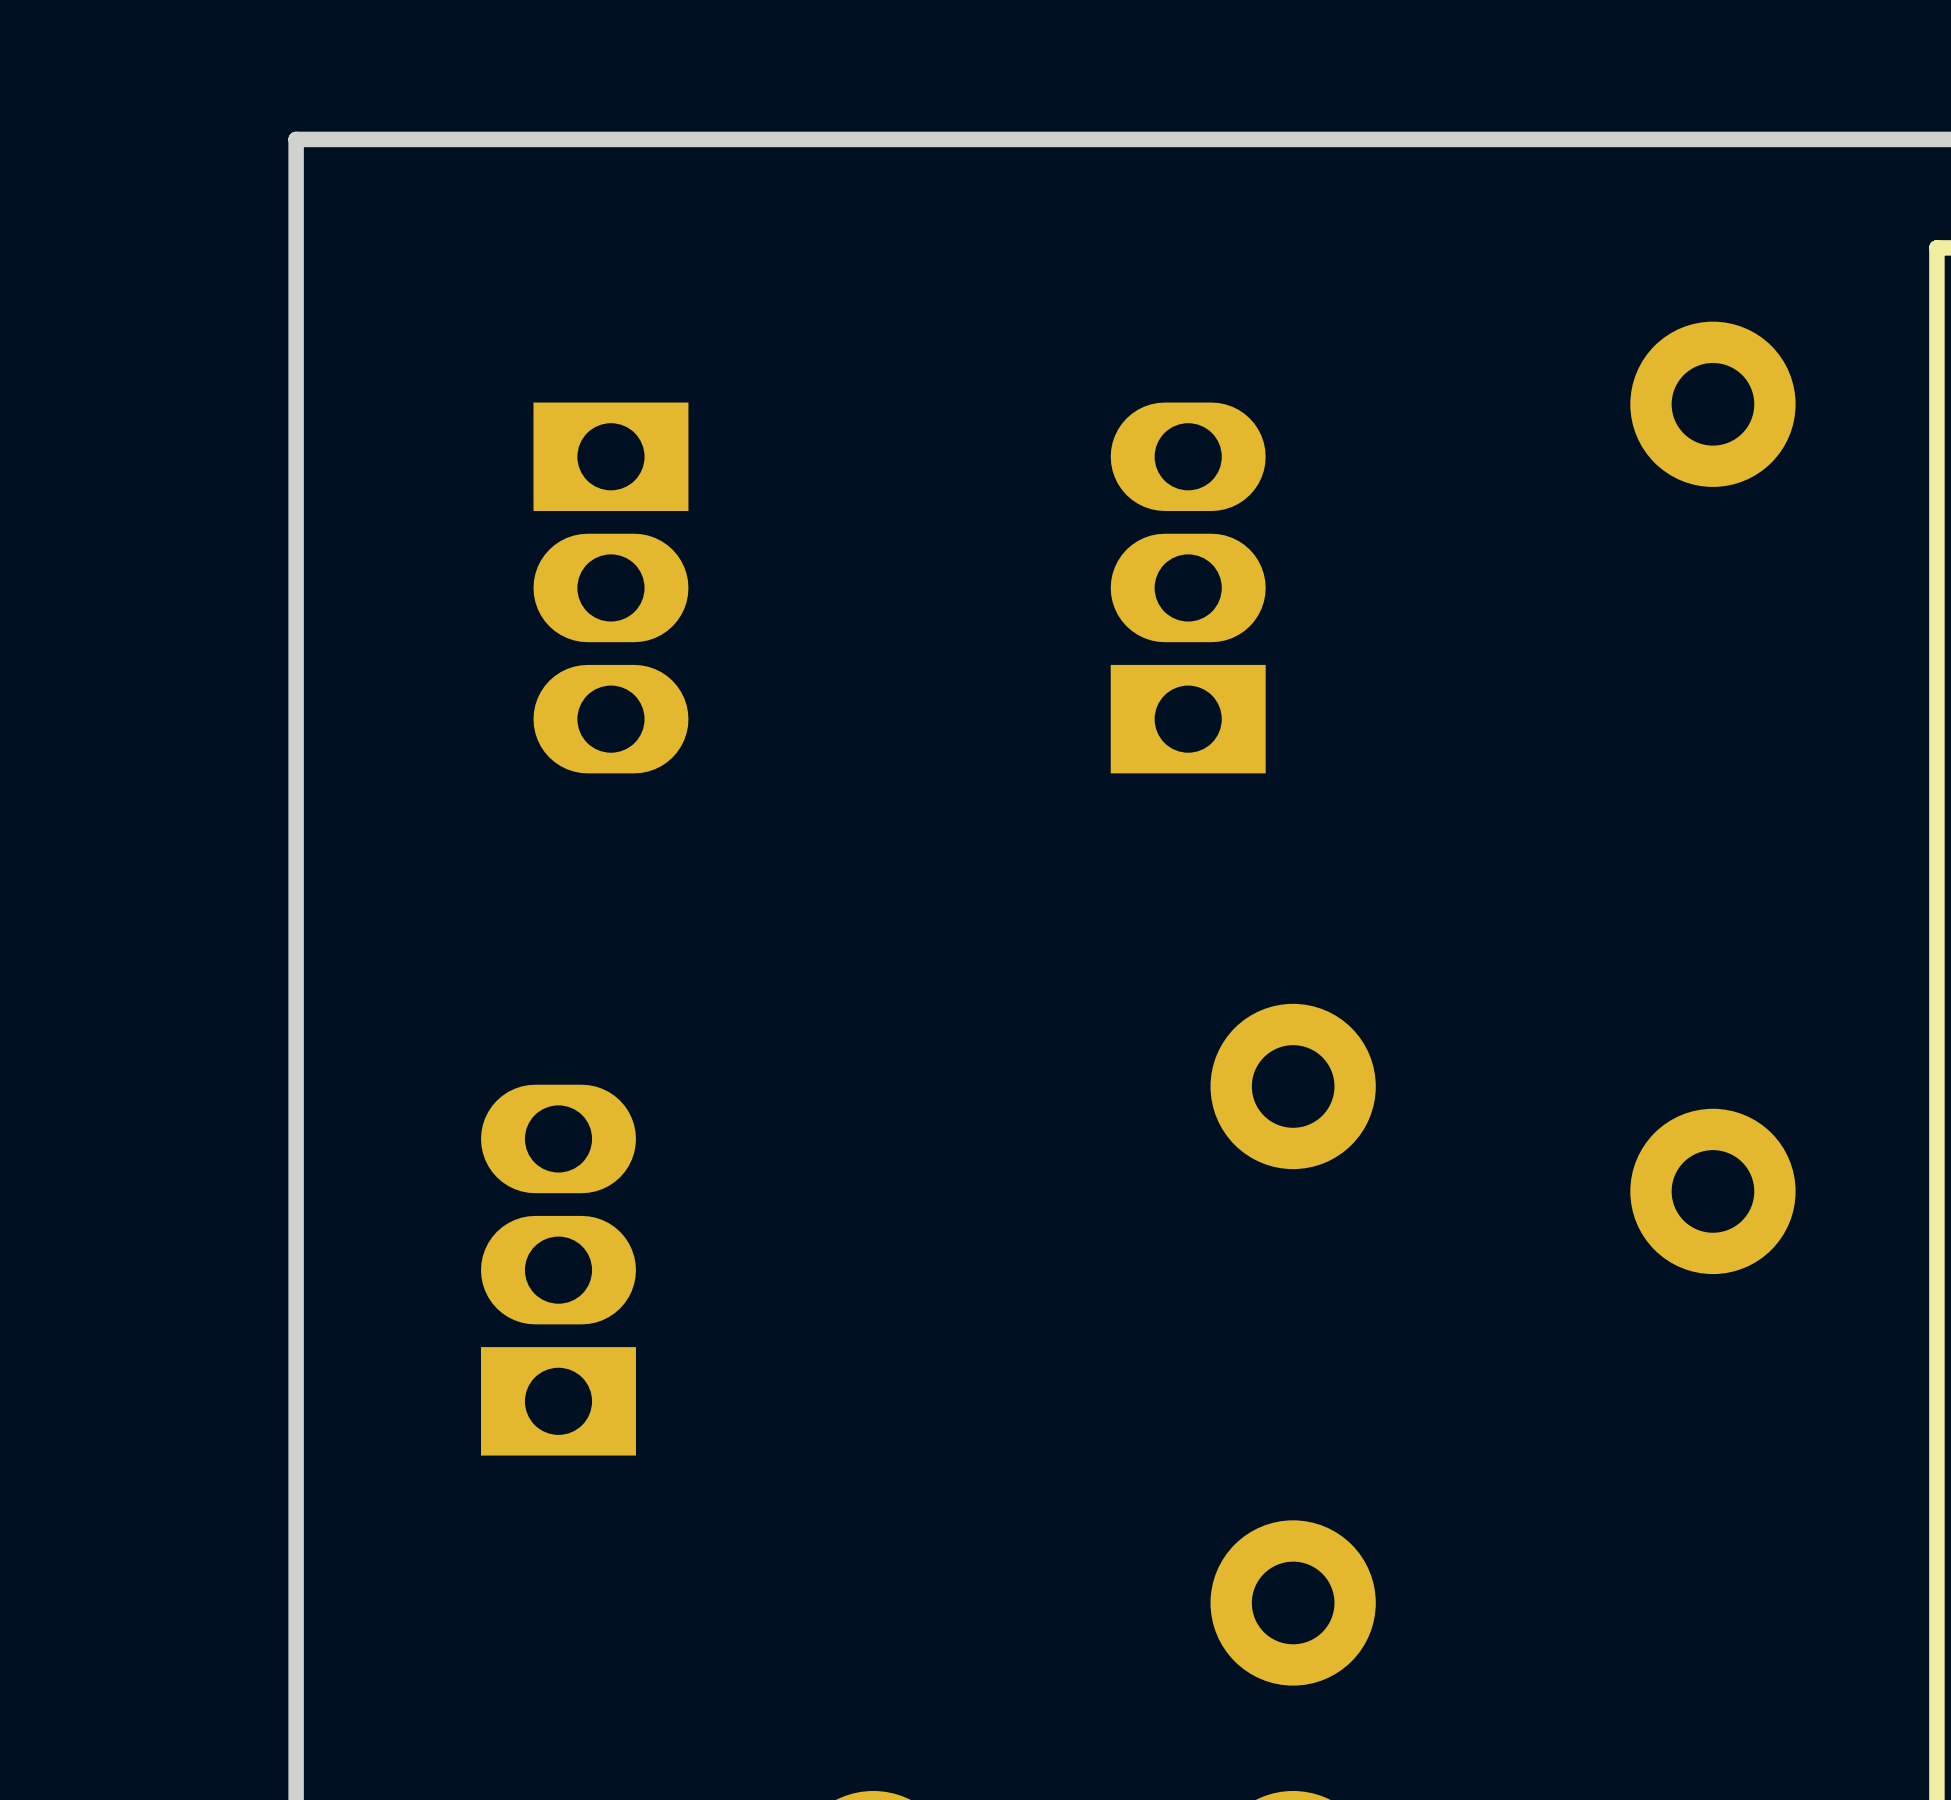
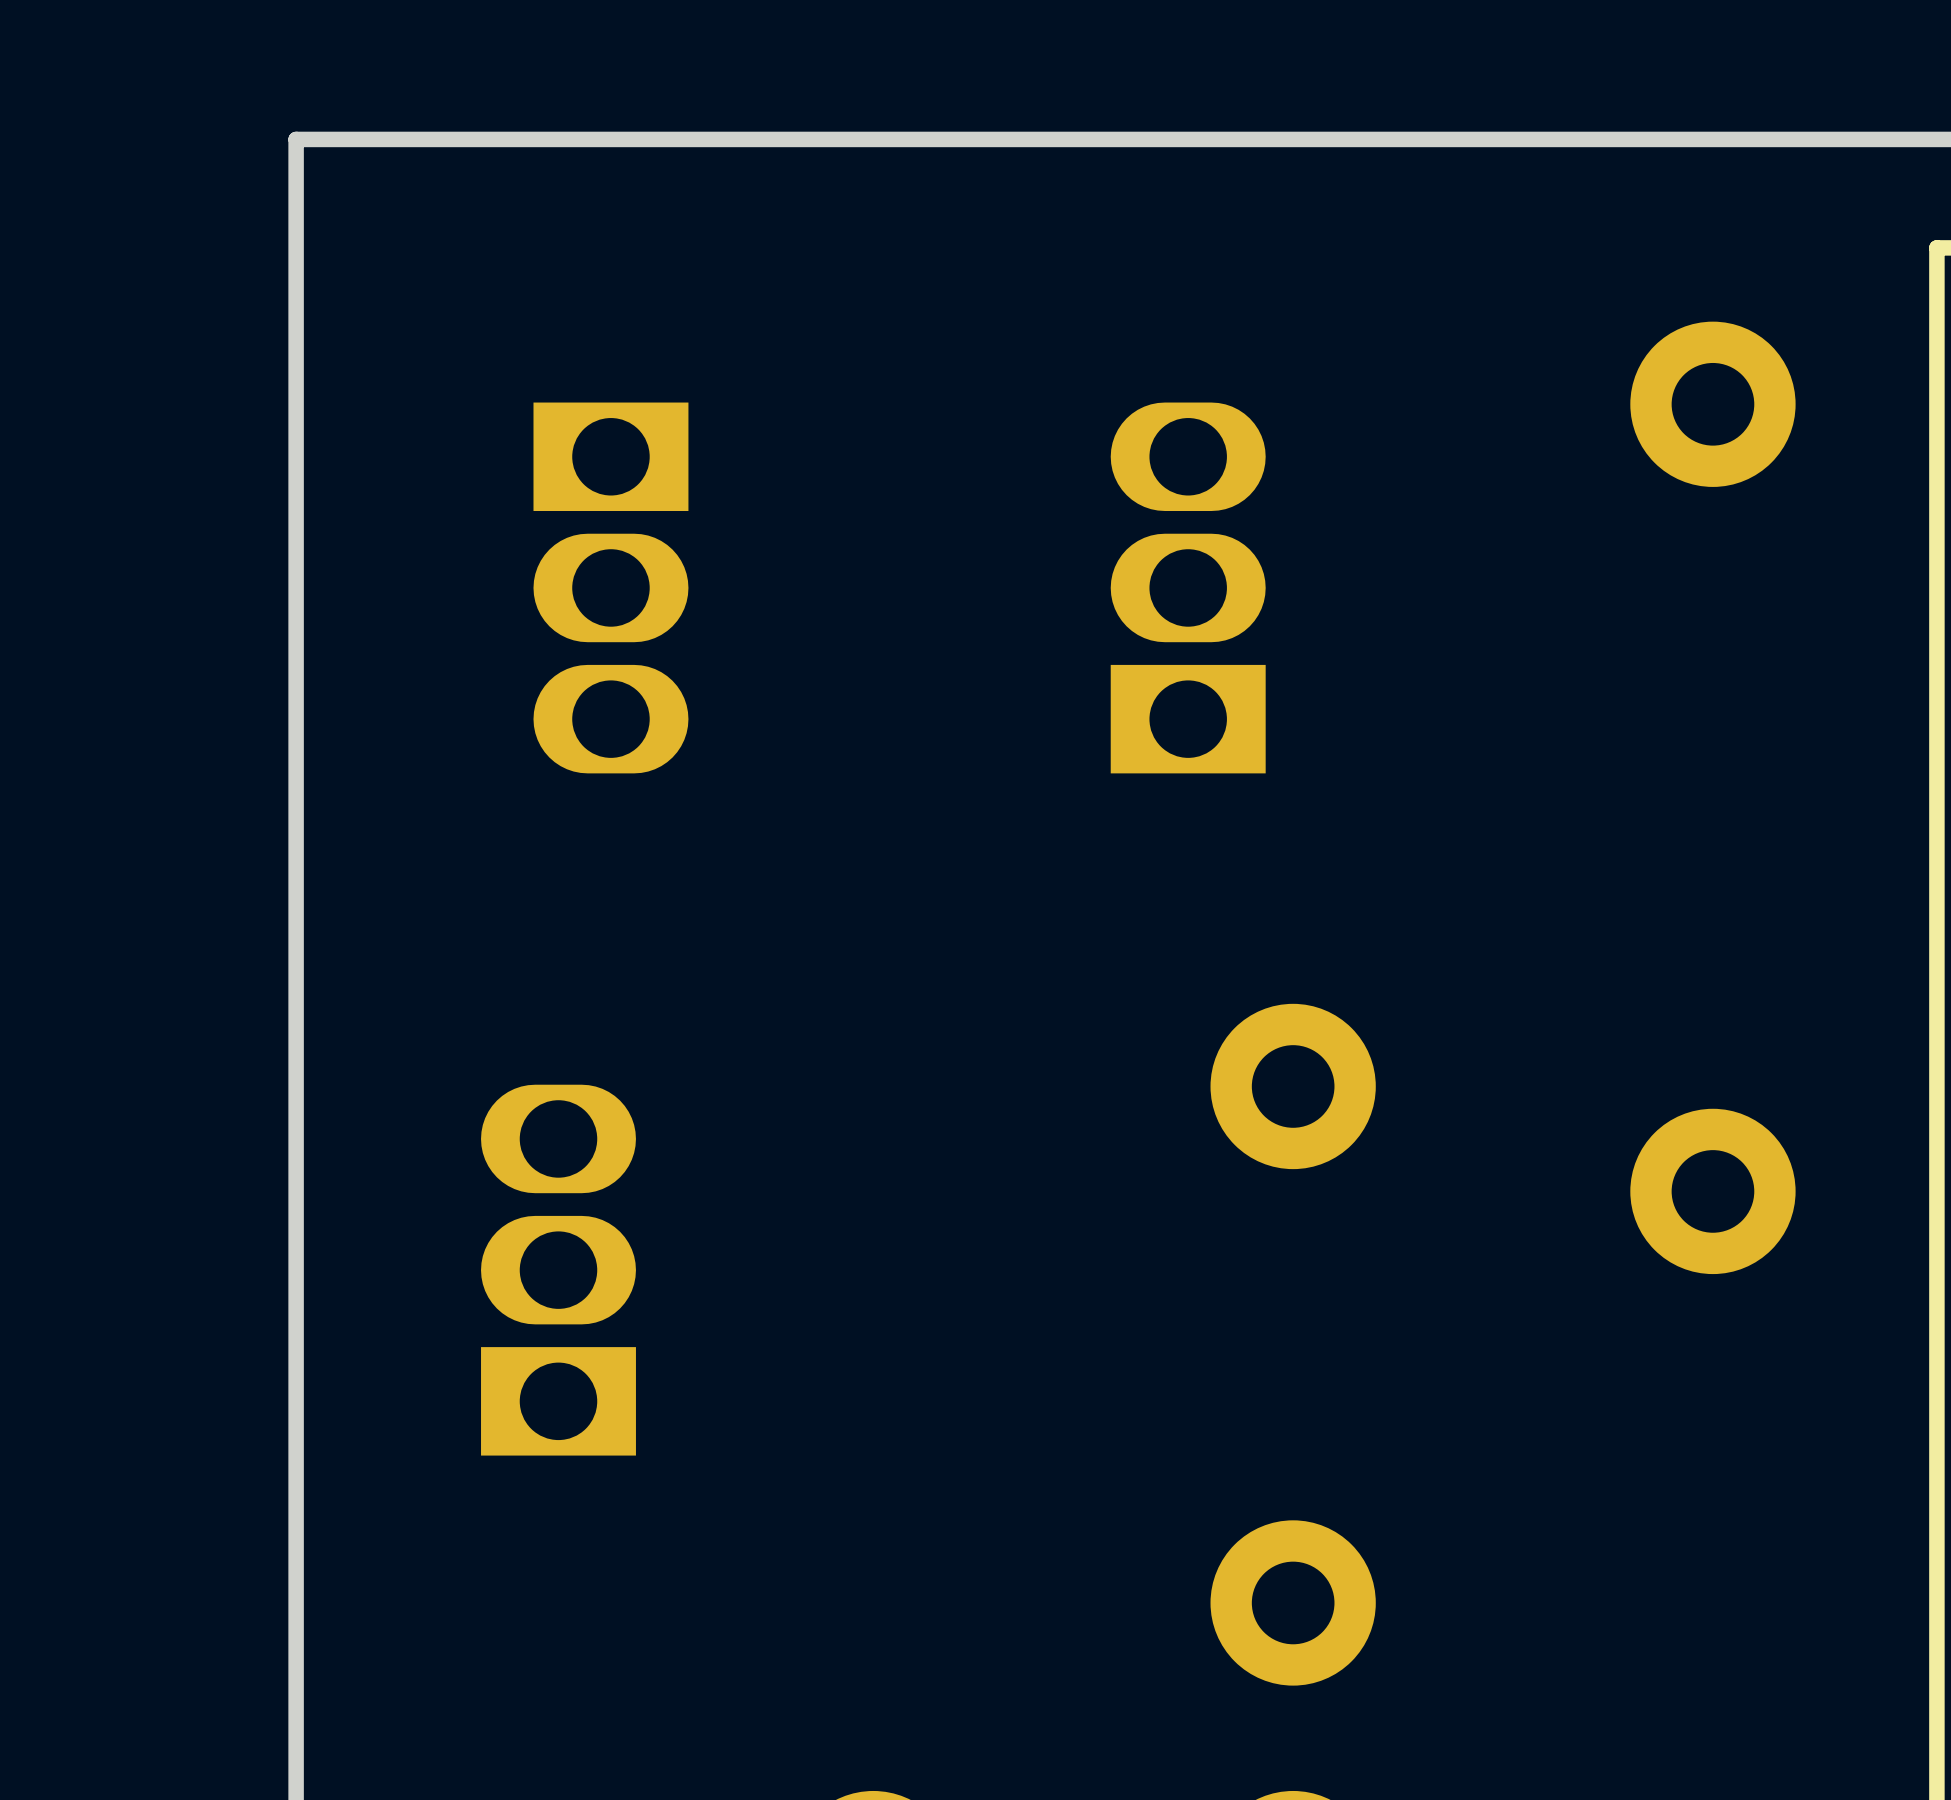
part footprint: [533, 402, 689, 774] -> [533, 402, 689, 774]
part footprint: [1110, 402, 1266, 774] -> [1110, 402, 1266, 774]
part footprint: [481, 1084, 636, 1456] -> [481, 1084, 636, 1456]

